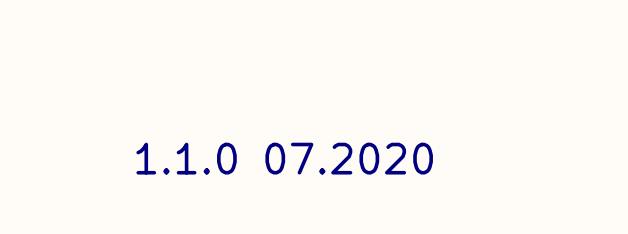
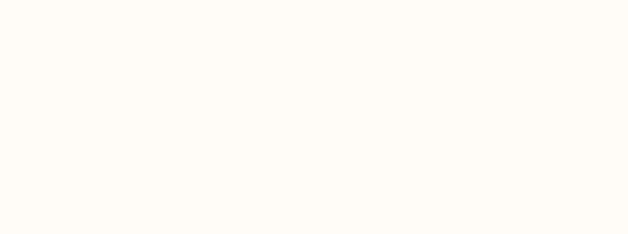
text: 1.1.0 07.2020 (284, 158) -> none

